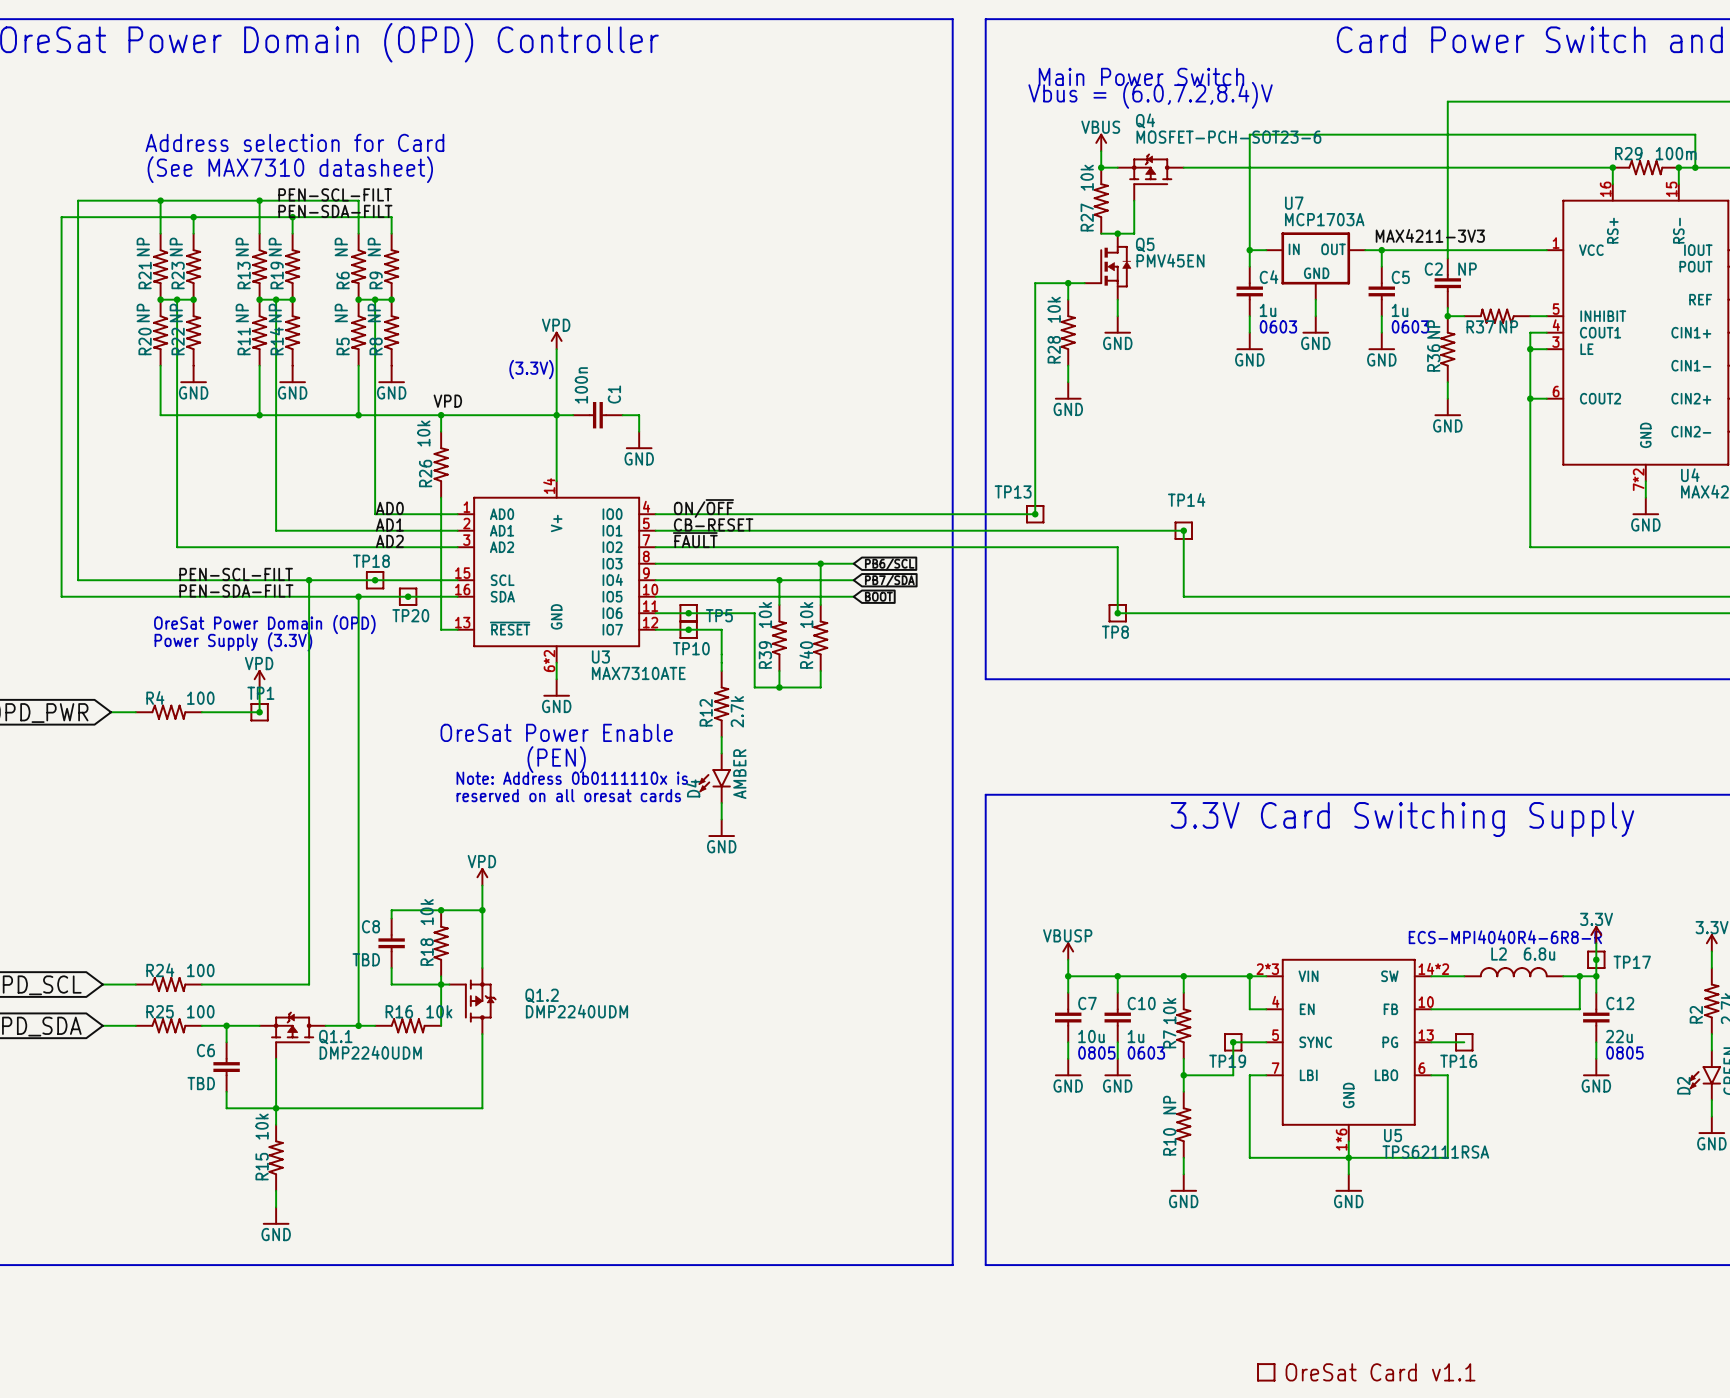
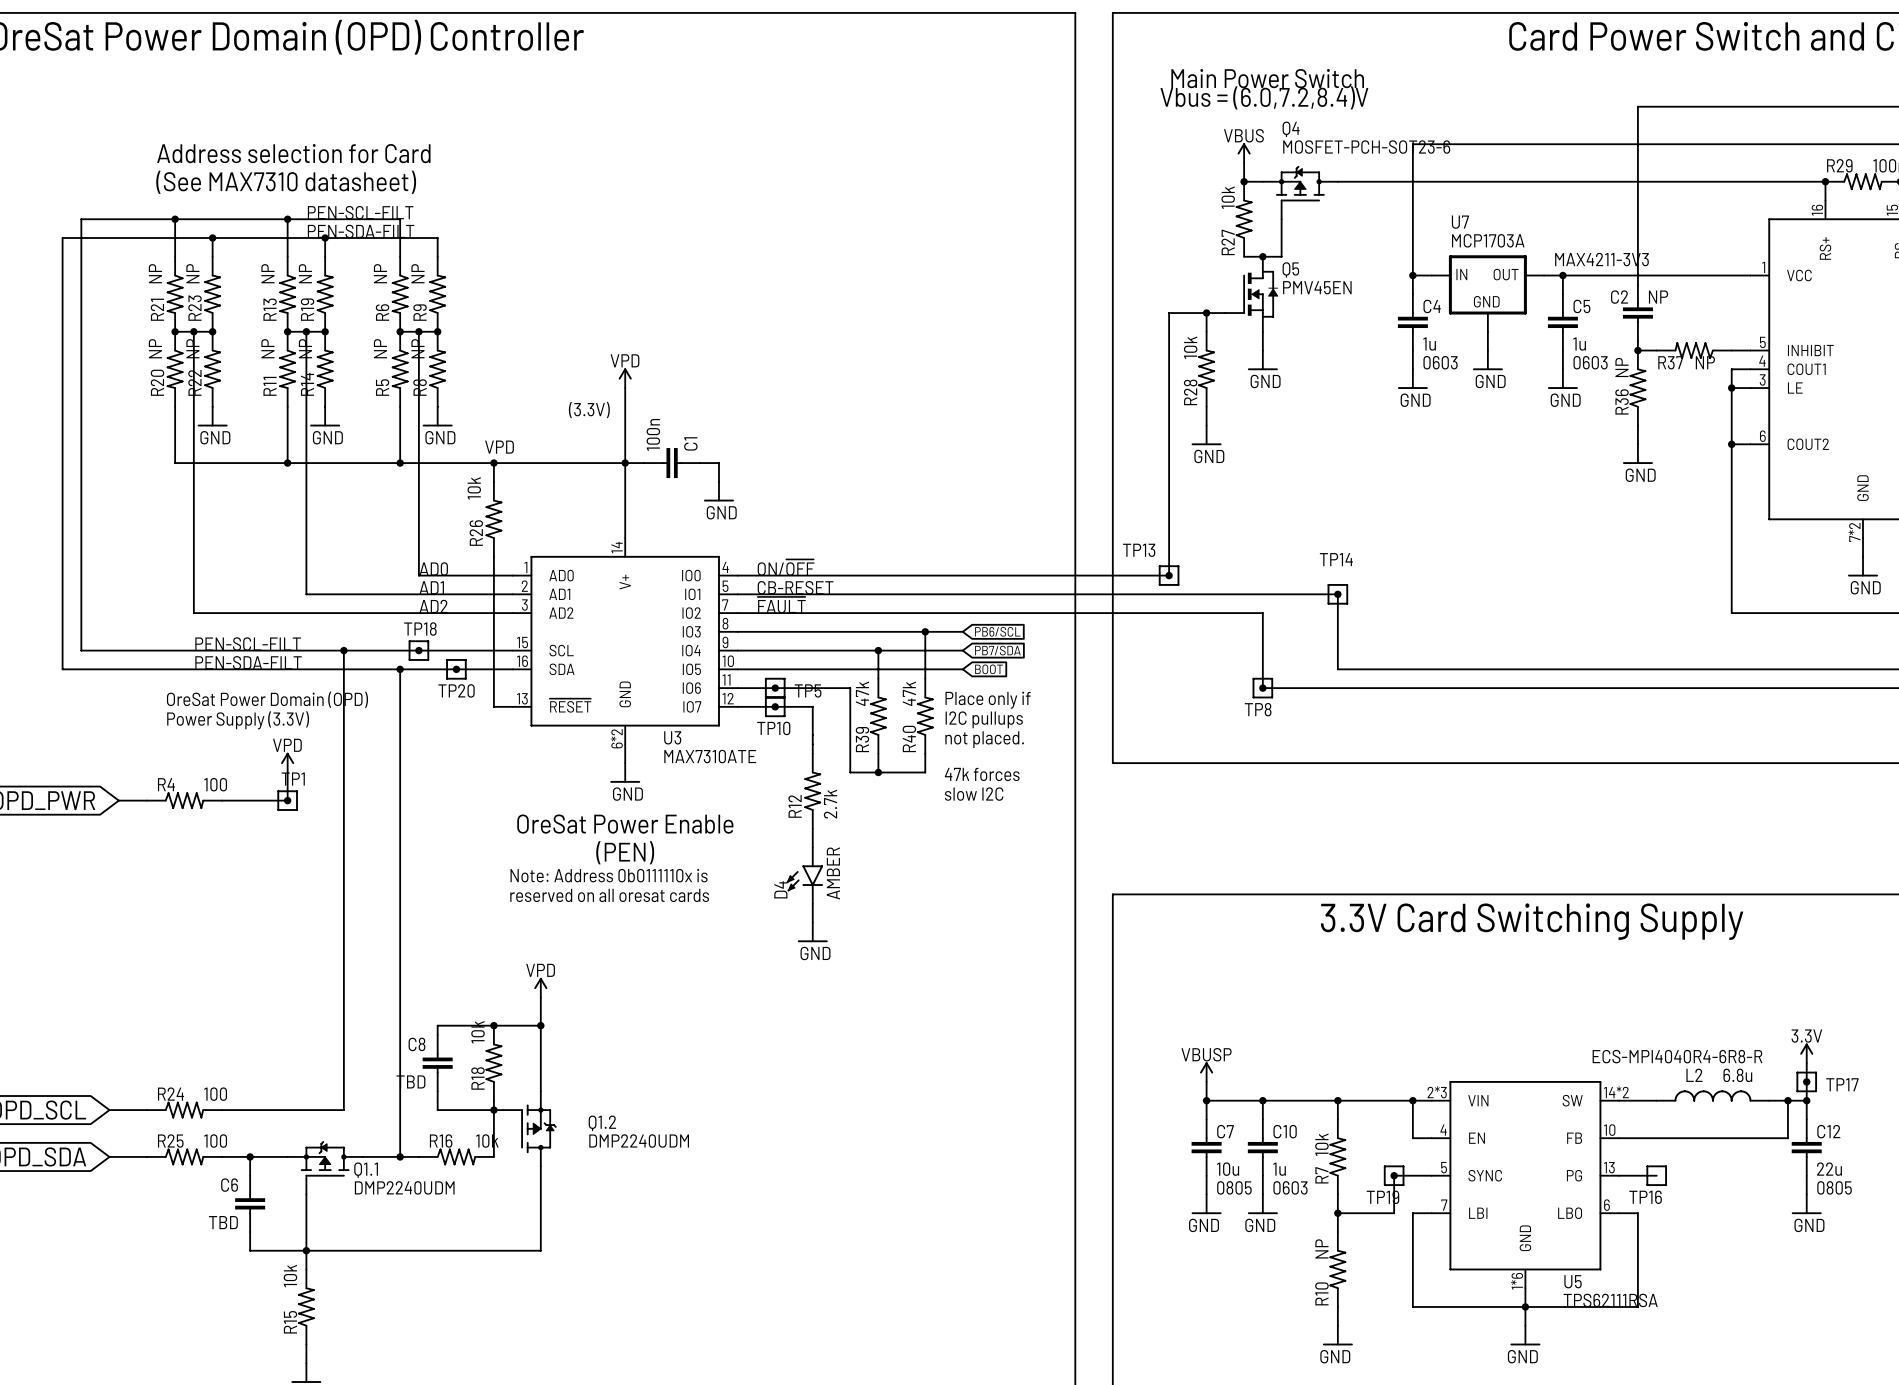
R39 value: 10k (765, 615) -> 47k (862, 693)
R40 value: 10k (806, 615) -> 47k (909, 693)
text: none -> Place only if (988, 700)
text: none -> I2C pullups (984, 719)
text: none -> not placed. (984, 739)
text: none -> 47k forces (982, 774)
text: none -> slow I2C (974, 794)

